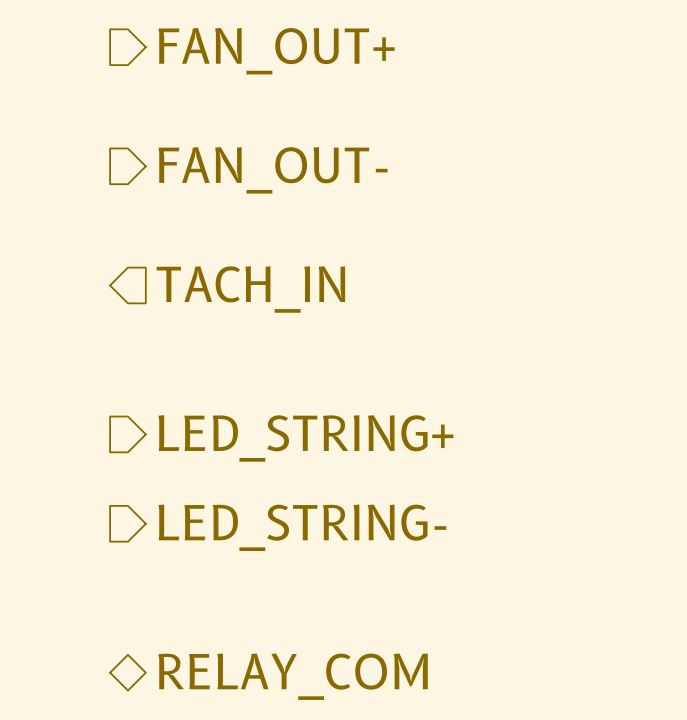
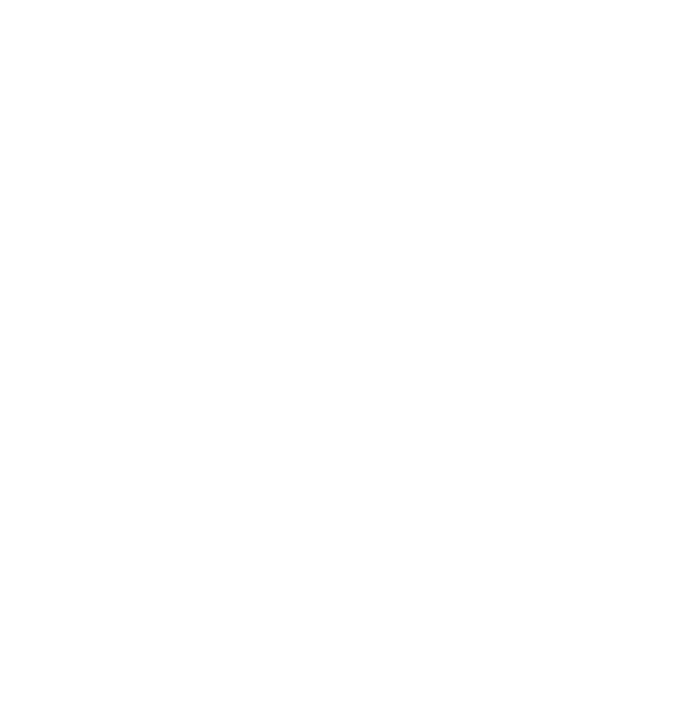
hierarchical label: FAN_OUT+ (276, 51) -> none
hierarchical label: FAN_OUT- (273, 170) -> none
hierarchical label: TACH_IN (250, 289) -> none
hierarchical label: LED_STRING+ (305, 438) -> none
hierarchical label: LED_STRING- (302, 527) -> none
hierarchical label: RELAY_COM (293, 676) -> none

